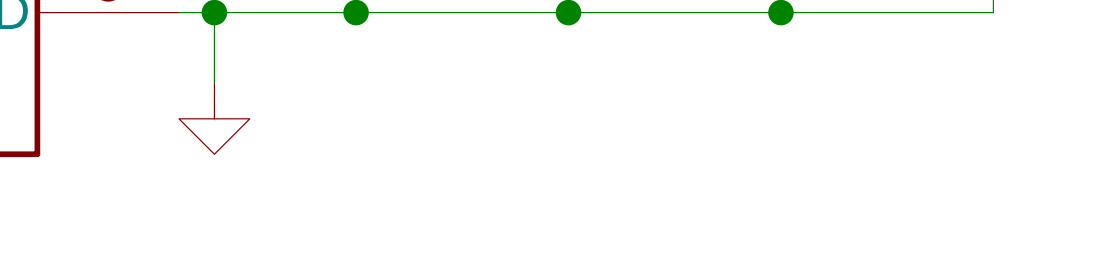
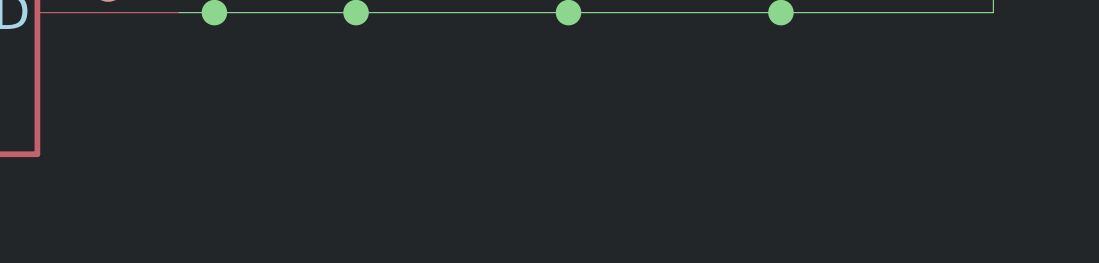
wire: (214, 12) (214, 83) -> none
power symbol: (214, 118) -> none

